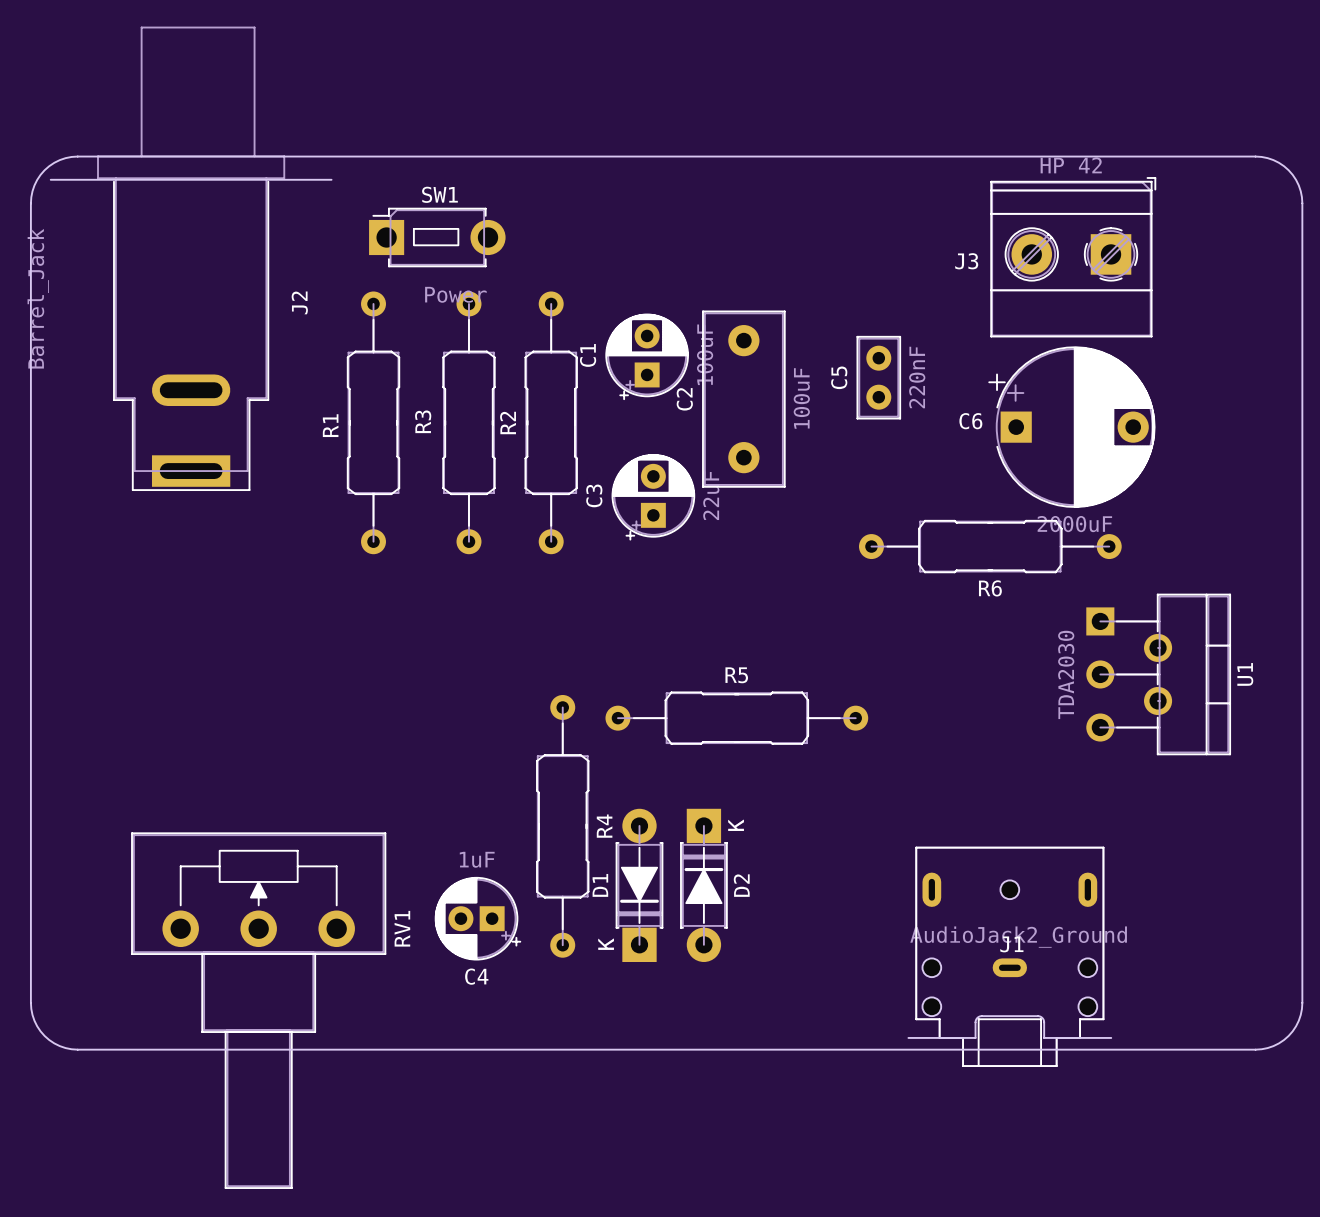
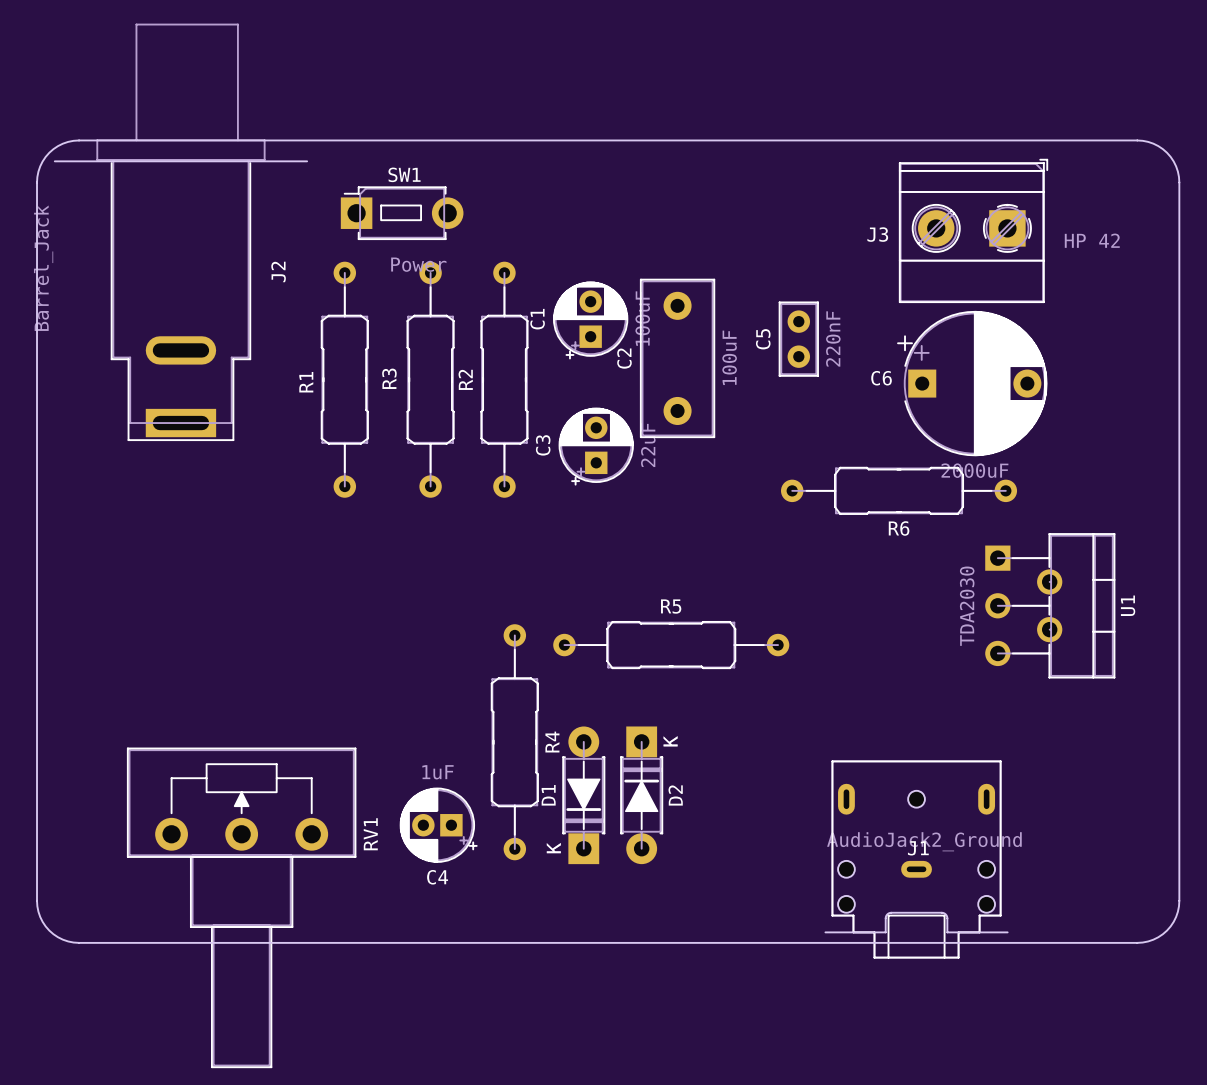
J3 value position: HP 42 (1071, 165) -> HP 42 (1092, 240)

